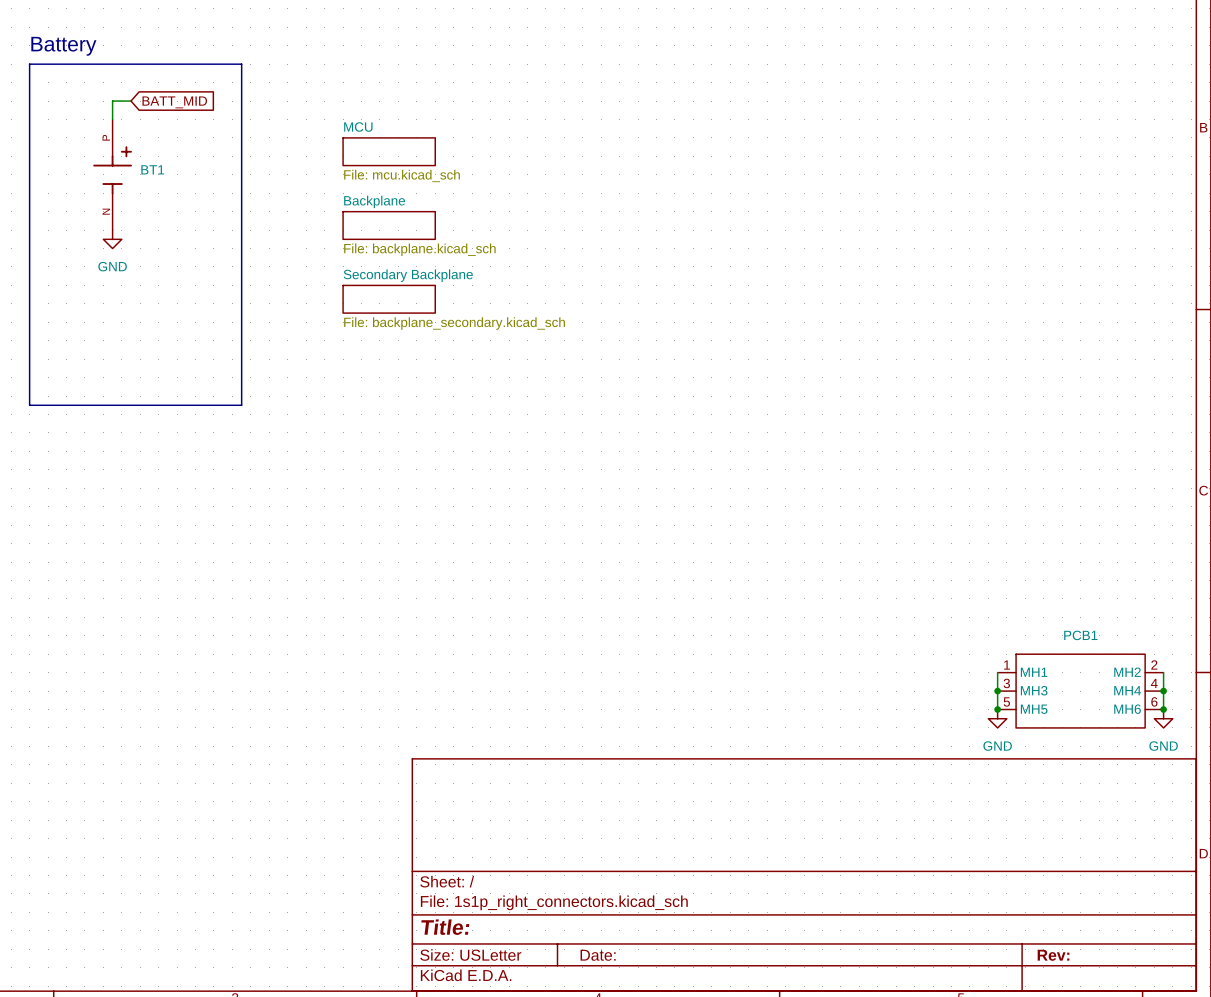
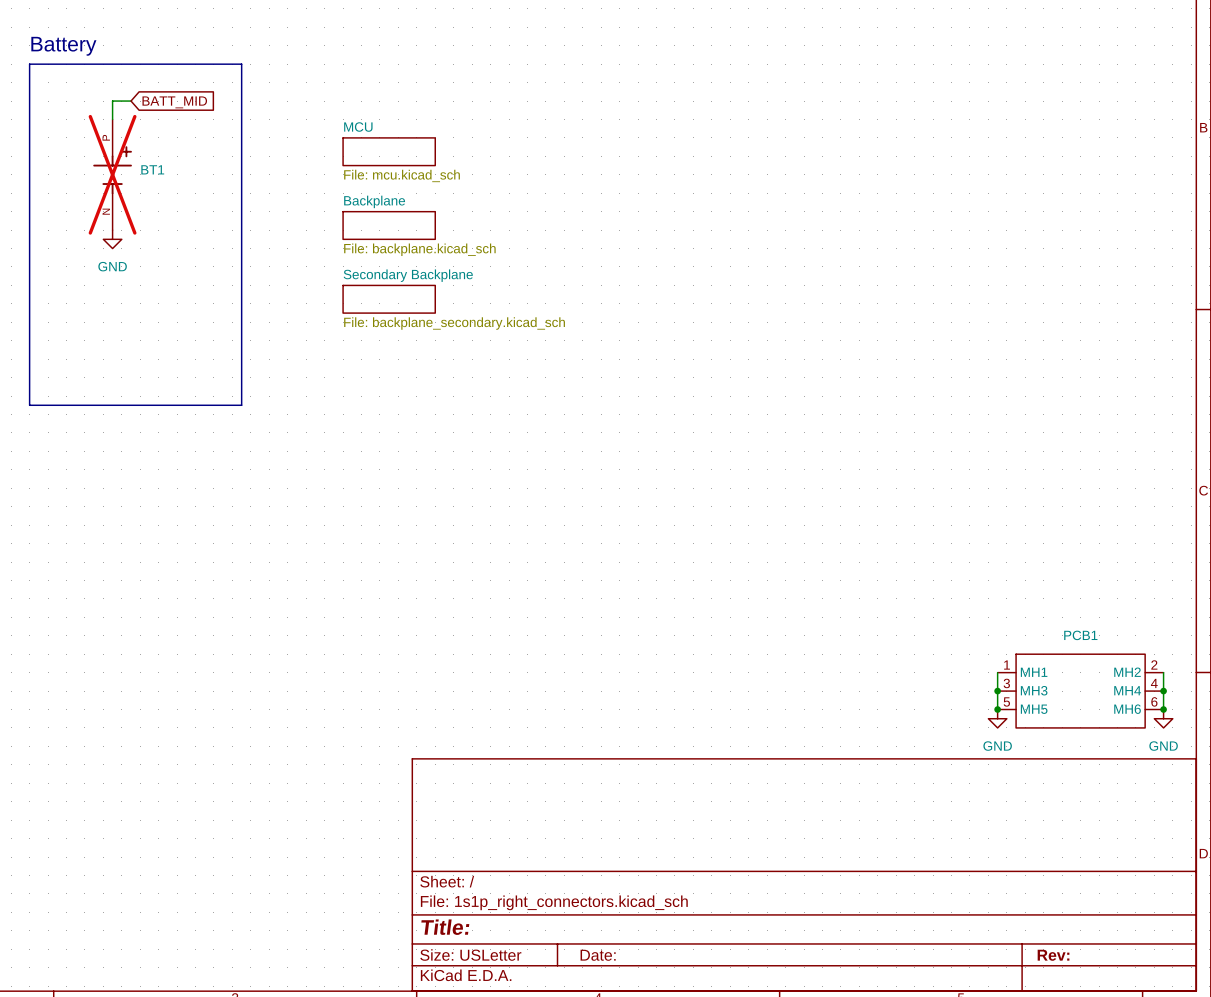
BT1 do-not-place cross: none -> (112, 174)

